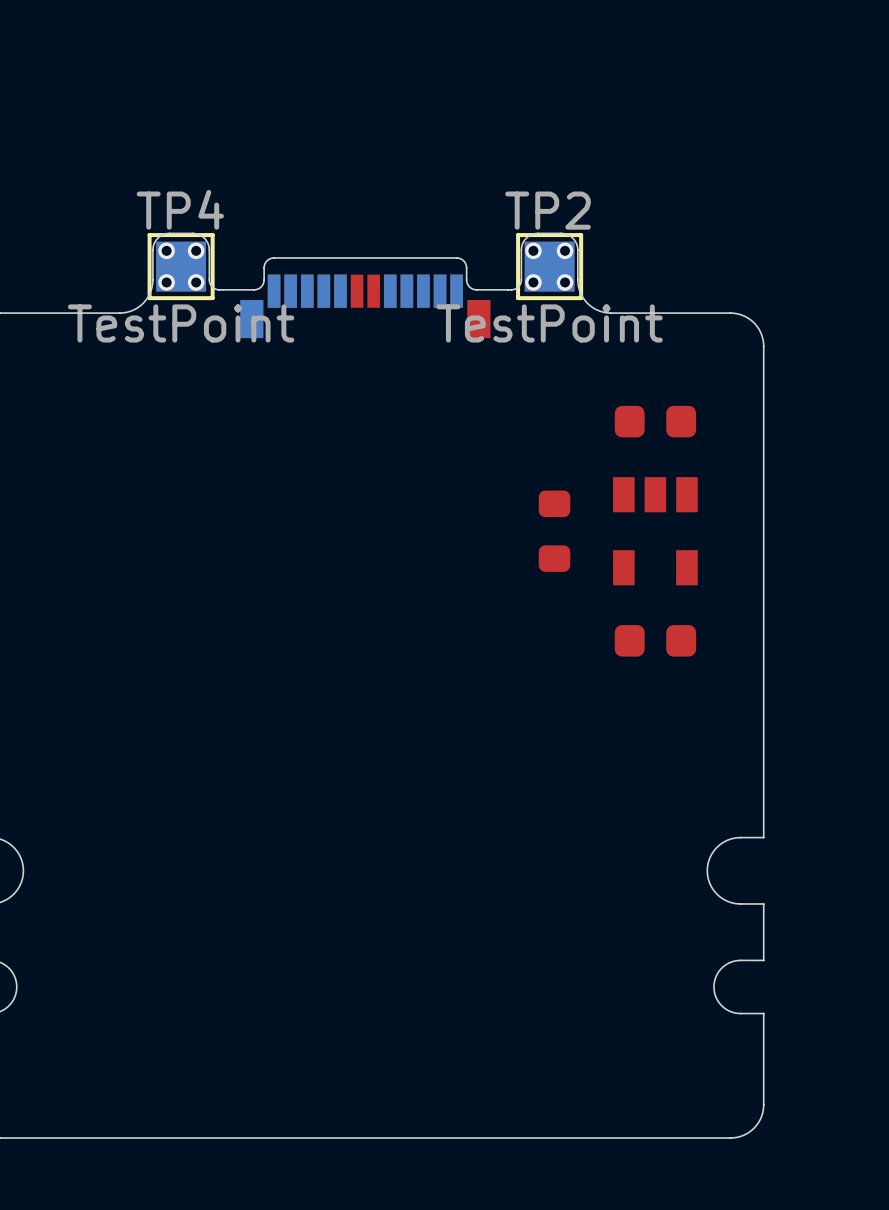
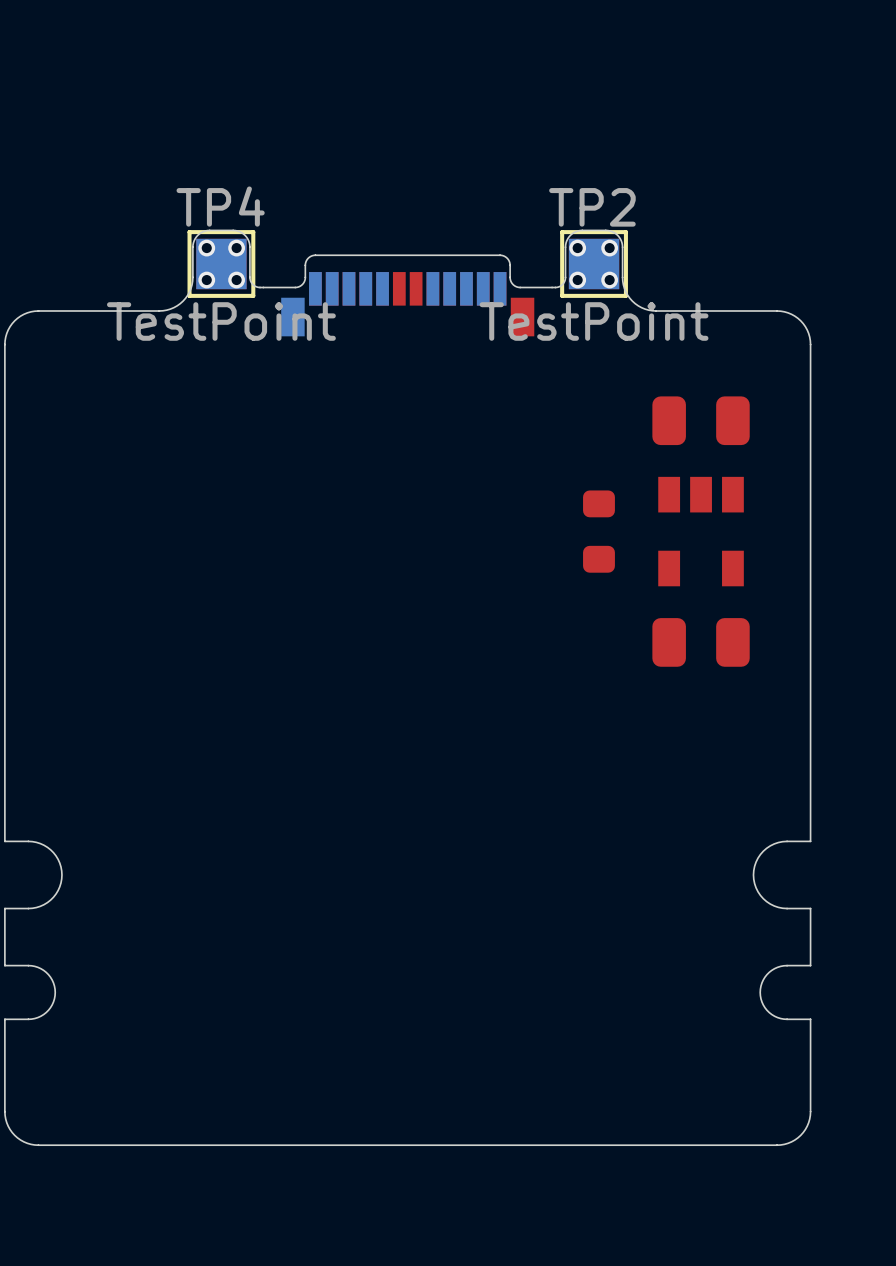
part footprint: [614, 405, 697, 438] -> [652, 396, 750, 446]
part footprint: [614, 625, 697, 657] -> [652, 618, 750, 667]

